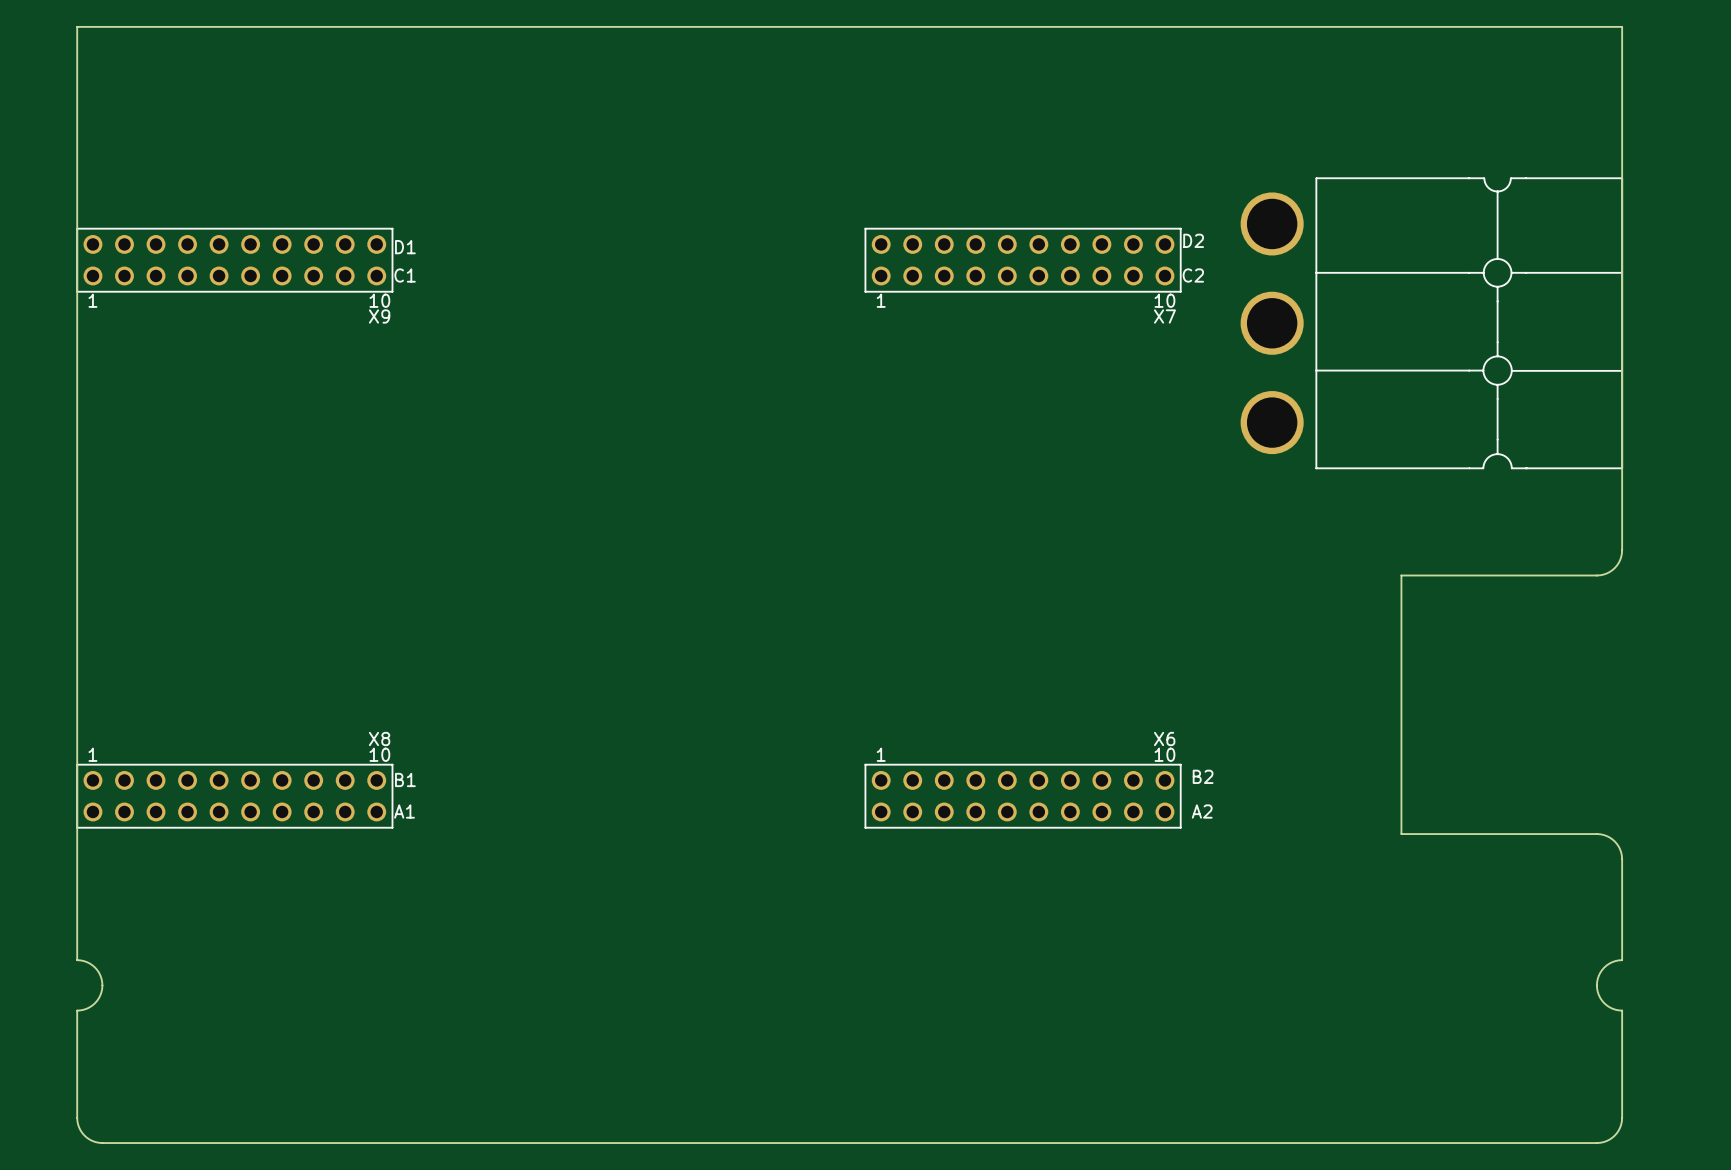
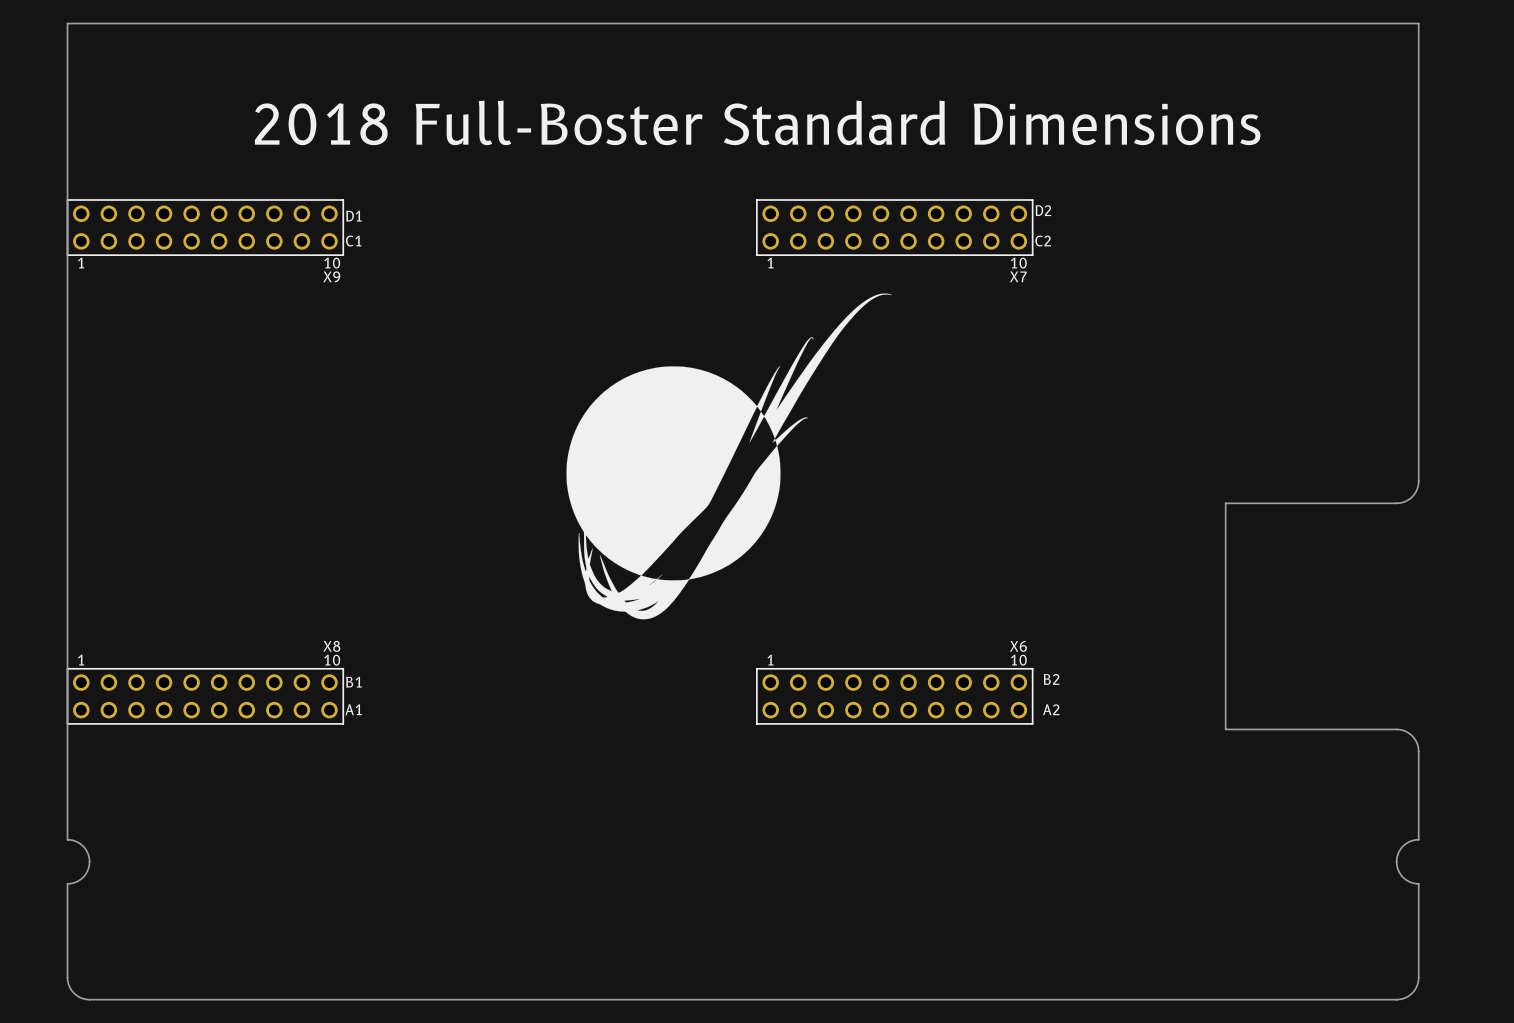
text: none -> 2018 Full-Boster Standard Dimensions (757, 122)
part: (1431, 323) -> none
drawing: none -> [566, 293, 893, 620]

